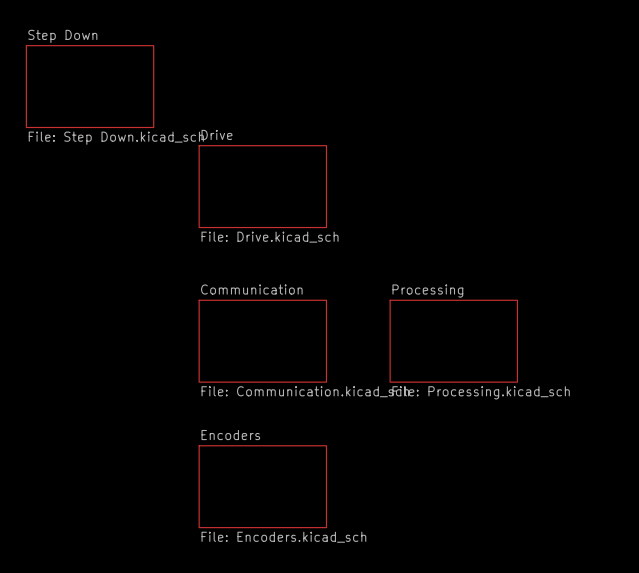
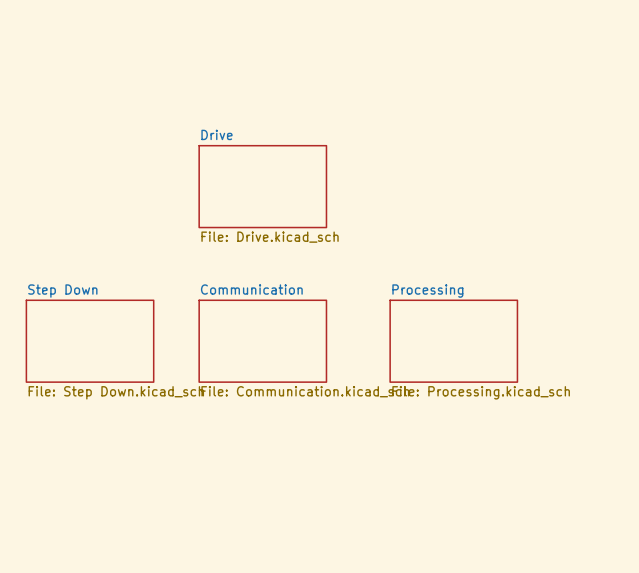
sheet Step Down: File: Step Down.kicad_sch (90, 86) -> none
sheet Step Down: none -> File: Step Down.kicad_sch (90, 341)
sheet Encoders: File: Encoders.kicad_sch (262, 486) -> none

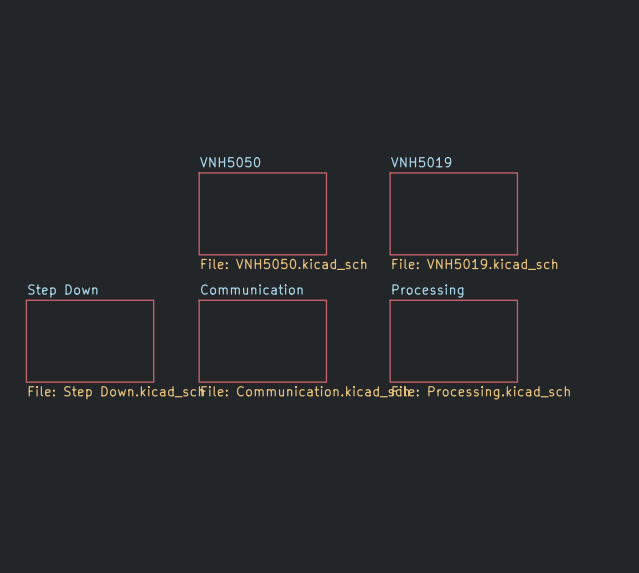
sheet Drive: File: Drive.kicad_sch (262, 186) -> none
sheet VNH5050: none -> File: VNH5050.kicad_sch (262, 213)
sheet VNH5019: none -> File: VNH5019.kicad_sch (453, 213)

